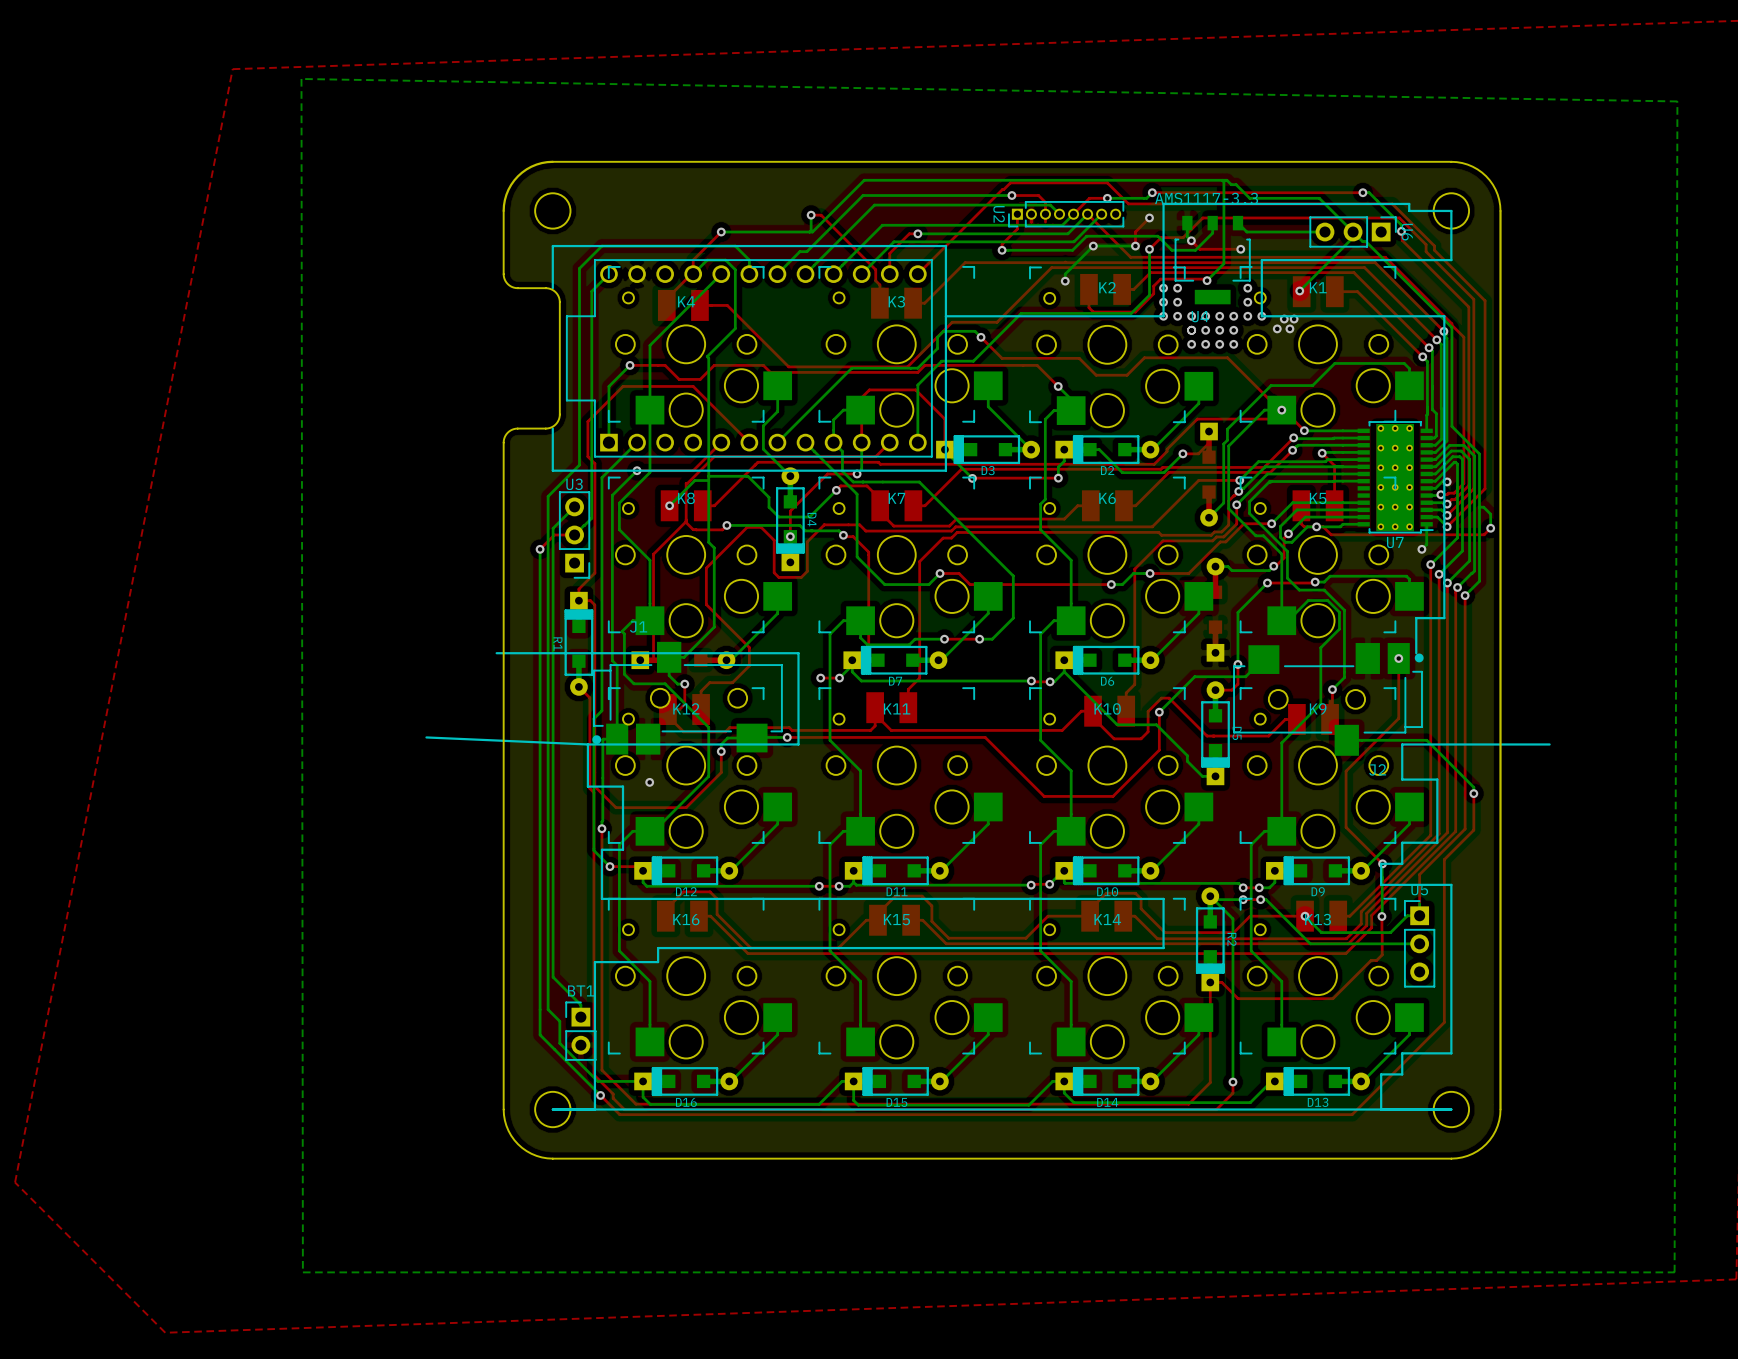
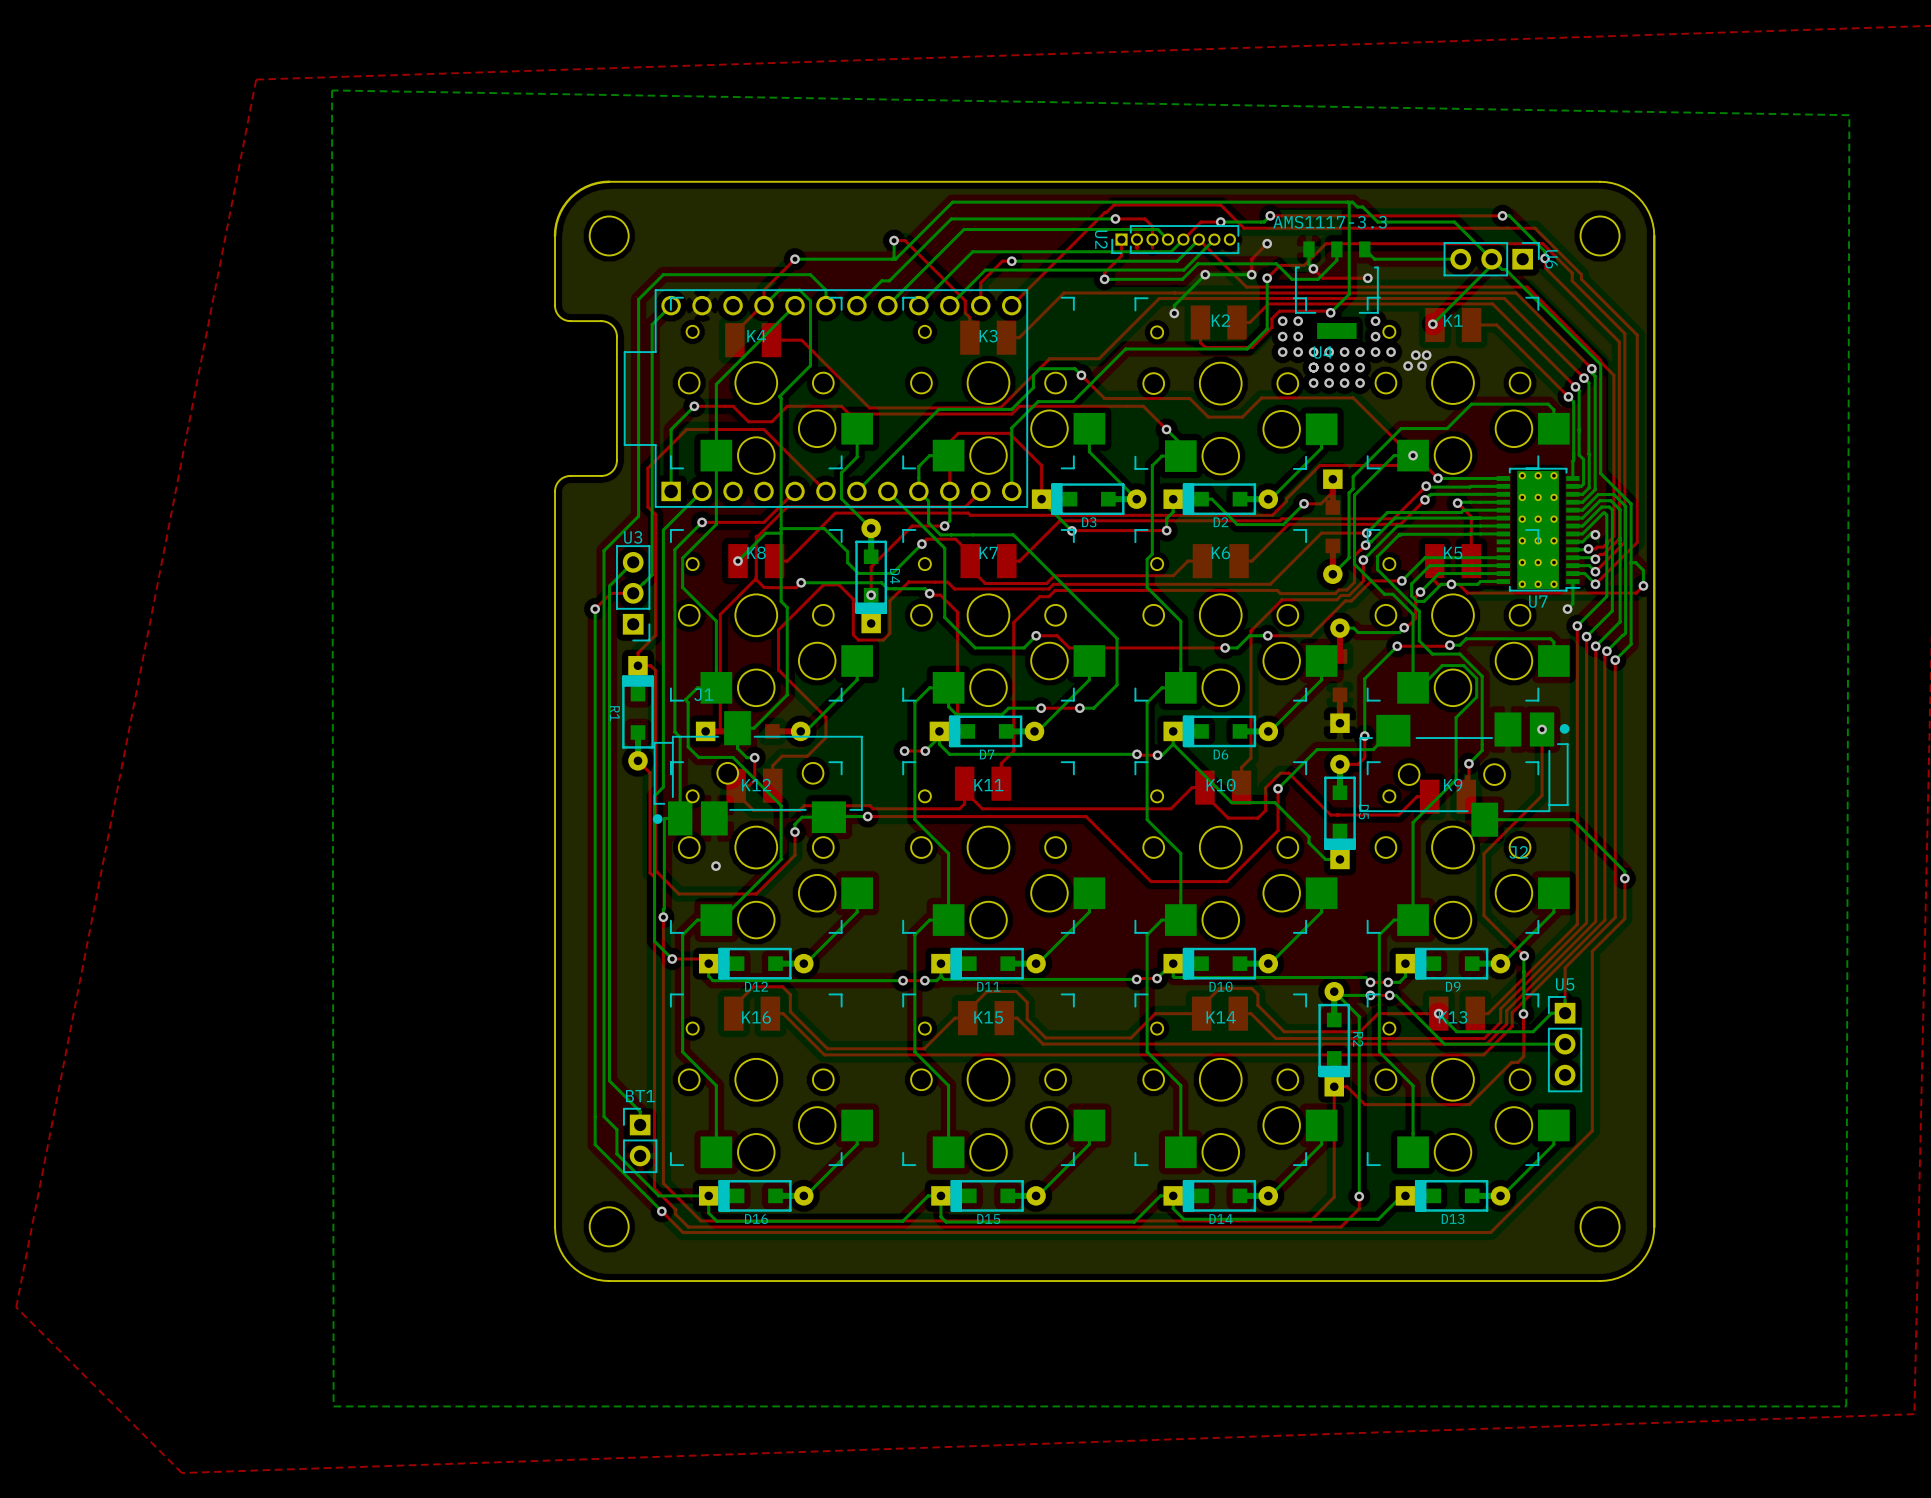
line: (552, 288) (552, 246) (945, 246) (945, 470) (552, 470) (552, 428) -> none
line: (945, 316) (1163, 316) (1163, 203) (1409, 203) (1409, 210) (1451, 210) (1451, 260) (1261, 260) (1261, 316) (1444, 316) (1444, 618) (1416, 618) (1416, 653) -> none
line: (496, 653) (798, 653) (798, 744) (587, 744) -> none
line: (426, 737) (587, 744) -> none
line: (587, 744) (587, 786) (623, 786) (623, 849) (601, 849) (601, 898) (1163, 898) (1163, 948) (658, 948) (658, 962) (594, 962) (594, 1109) -> none
line: (1549, 744) (1402, 744) (1402, 779) (1437, 779) (1437, 842) (1402, 842) (1402, 863) (1381, 863) (1381, 884) (1451, 884) (1451, 1053) (1402, 1053) (1402, 1074) (1381, 1074) (1381, 1109) -> none
line: (1451, 1109) (552, 1109) -> none

